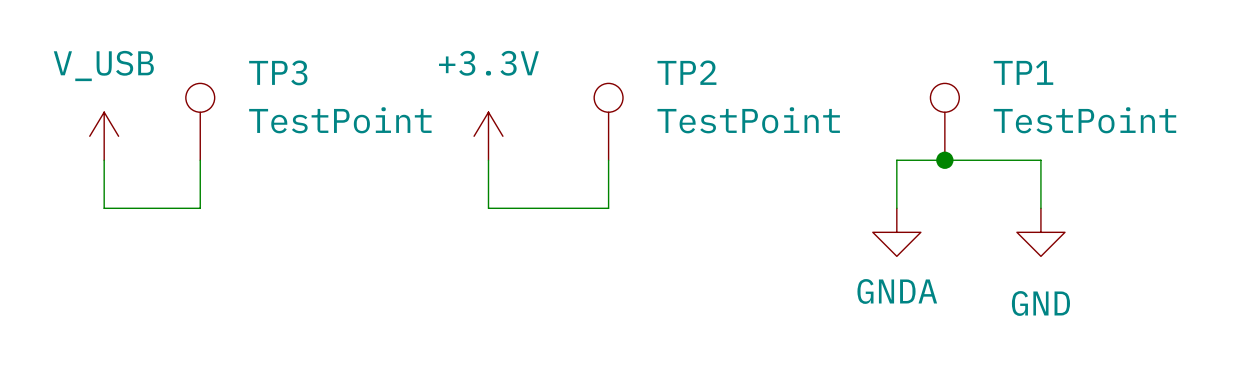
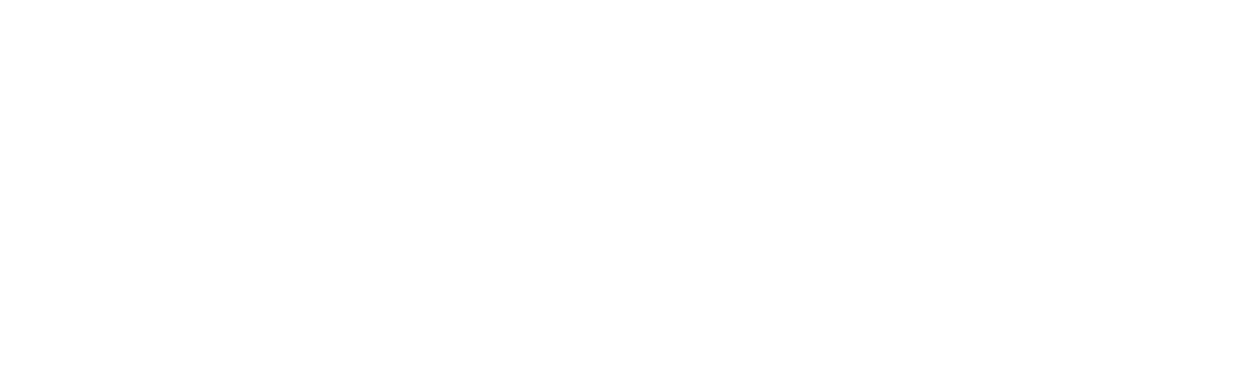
TP3: TestPoint (200, 121) -> none
TP2: TestPoint (608, 121) -> none
TP1: TestPoint (944, 121) -> none
power symbol: V_USB (104, 136) -> none
power symbol: +3.3V (488, 136) -> none
wire: (104, 160) (104, 208) (200, 208) (200, 160) -> none
wire: (488, 160) (488, 208) (608, 208) (608, 160) -> none
junction: (944, 160) -> none
wire: (896, 208) (896, 160) (1040, 160) (1040, 208) -> none
power symbol: GNDA (896, 232) -> none
power symbol: GND (1040, 232) -> none

